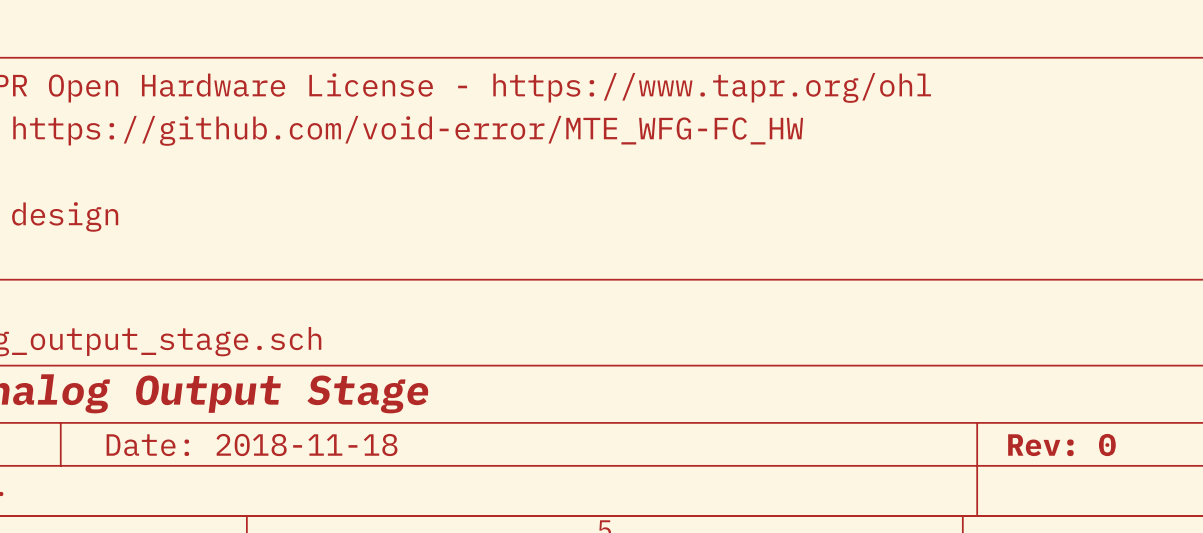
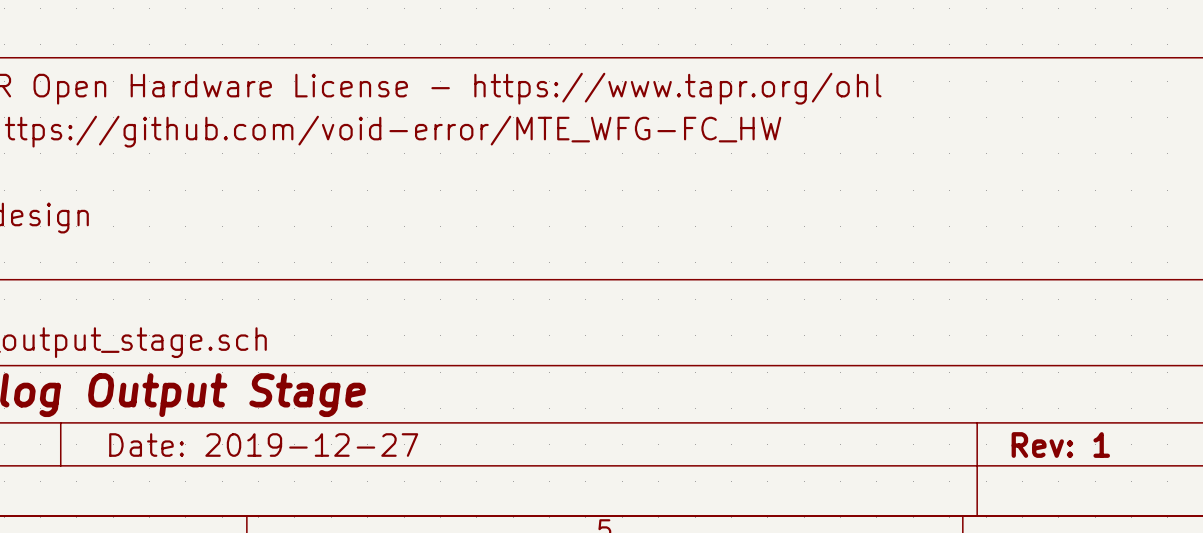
title block: Date: 2018-11-18 (252, 445) -> Date: 2019-12-27 (263, 445)
title block: Rev: 0 (1061, 445) -> Rev: 1 (1060, 445)

